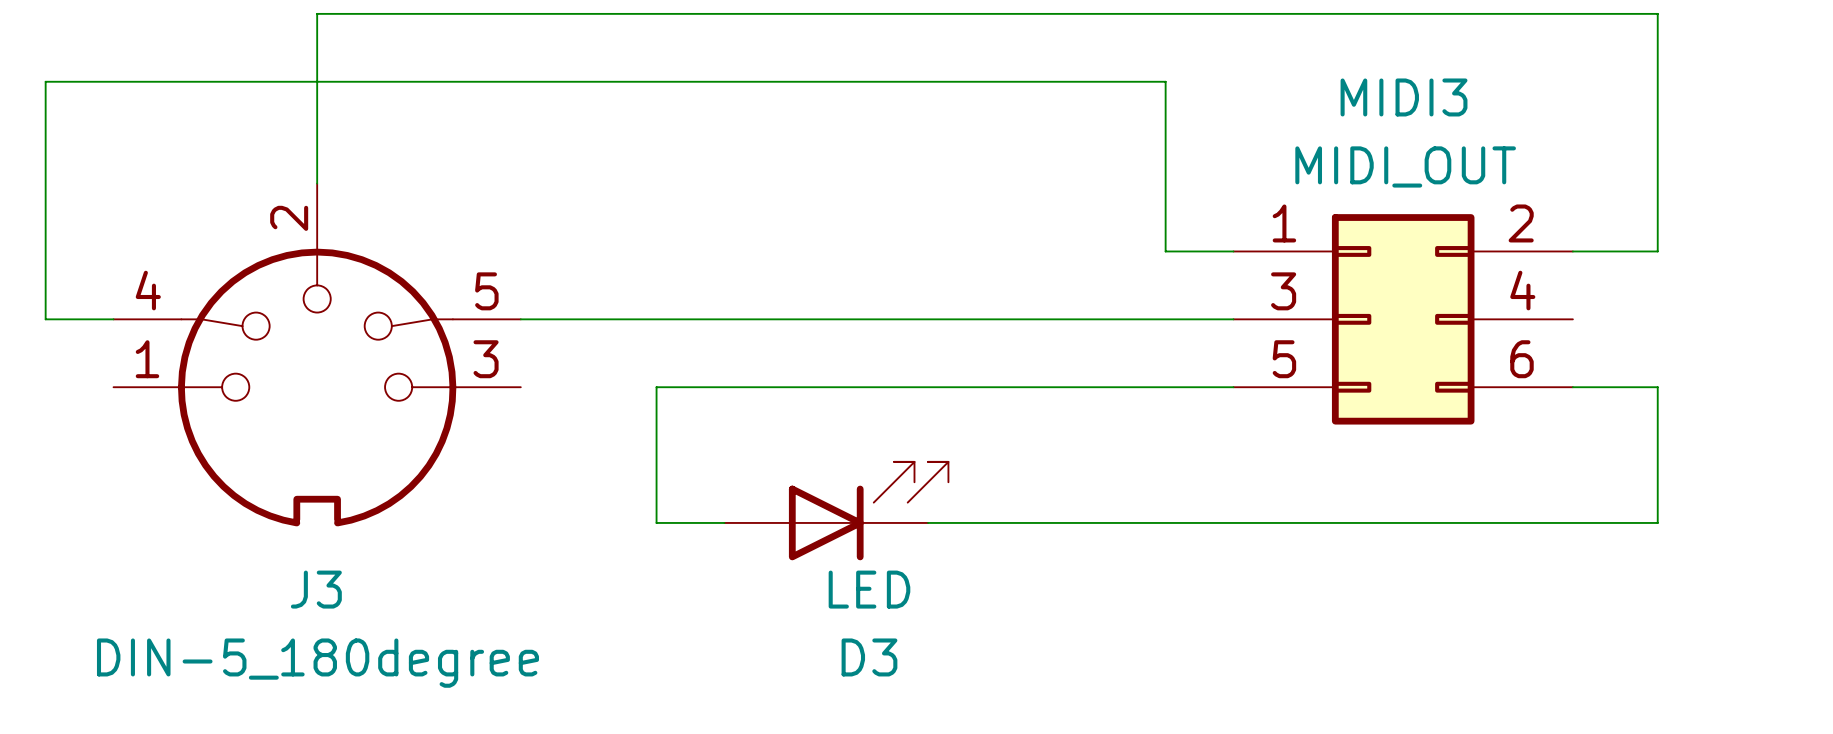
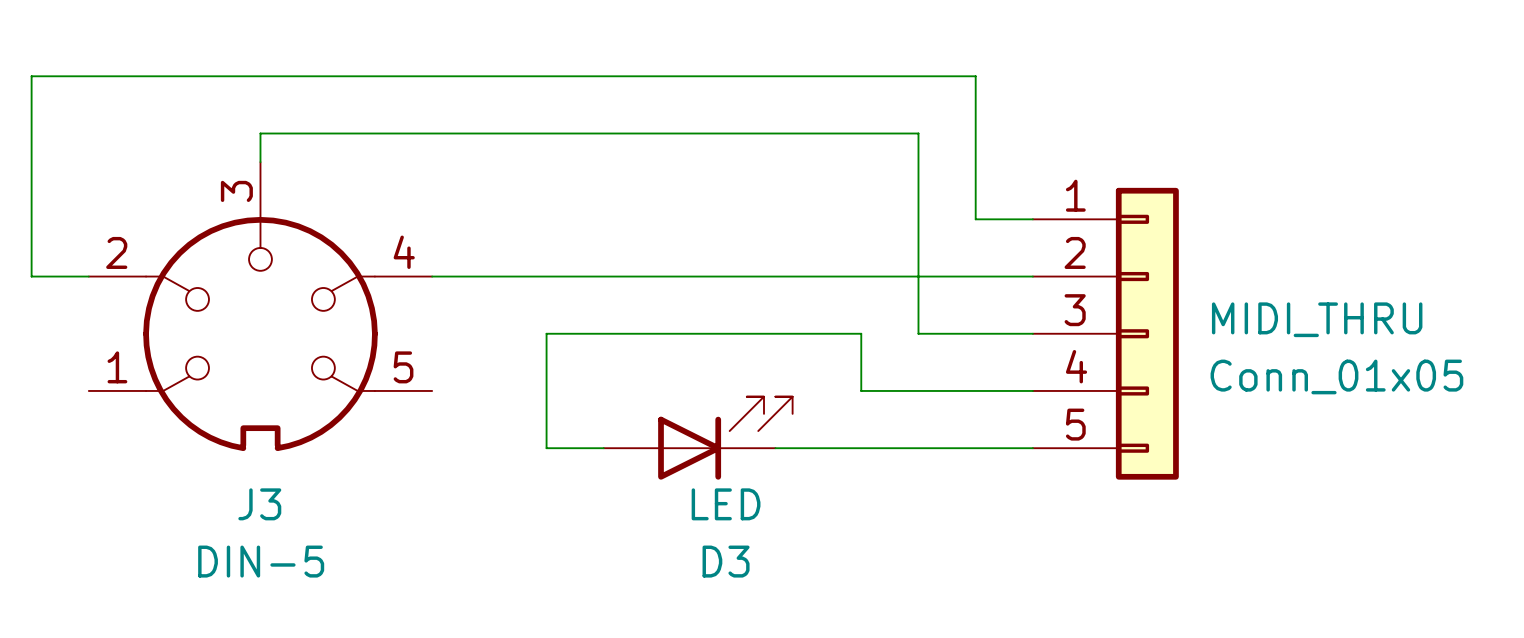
wire: (317, 149) (317, 13) (1657, 13) (1657, 251) (1572, 251) -> (260, 133) (918, 133) (918, 333)
J3 symbol: [113, 183, 521, 527] -> [88, 162, 433, 452]
MIDI3: MIDI_OUT (1403, 319) -> none
wire: (1029, 387) (1097, 387) -> (861, 333) (861, 390) (1032, 390)
MIDI_THRU: none -> Conn_01x05 (1105, 333)
wire: (1572, 387) (1657, 387) (1657, 522) (1233, 522) -> none
J3 value: DIN-5_180degree (317, 663) -> DIN-5 (261, 561)

